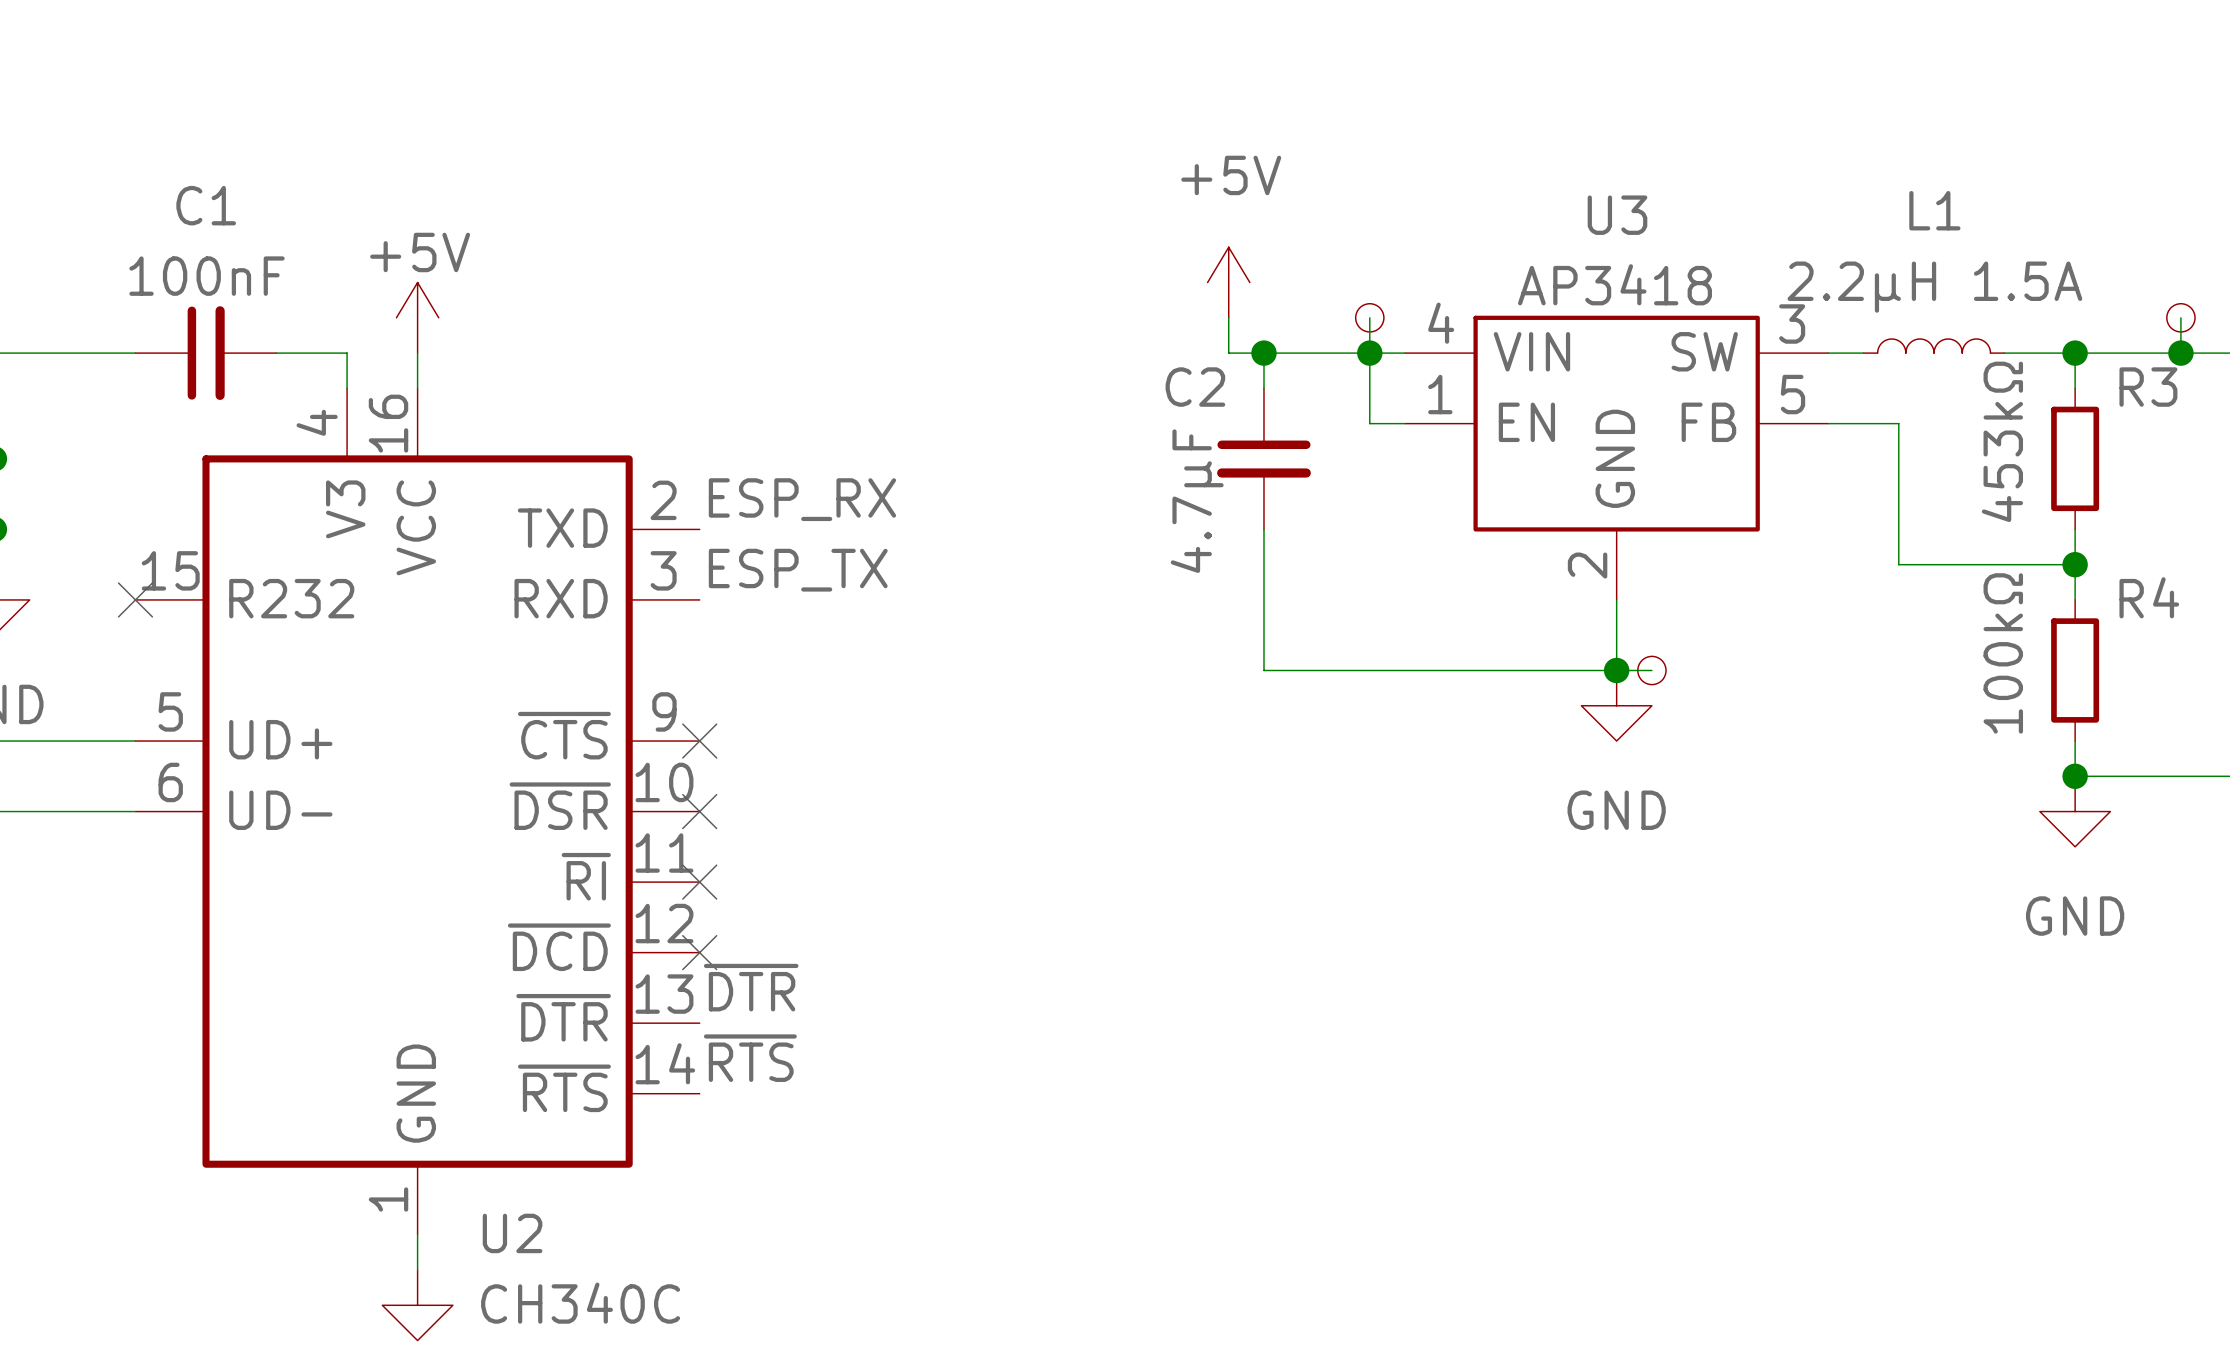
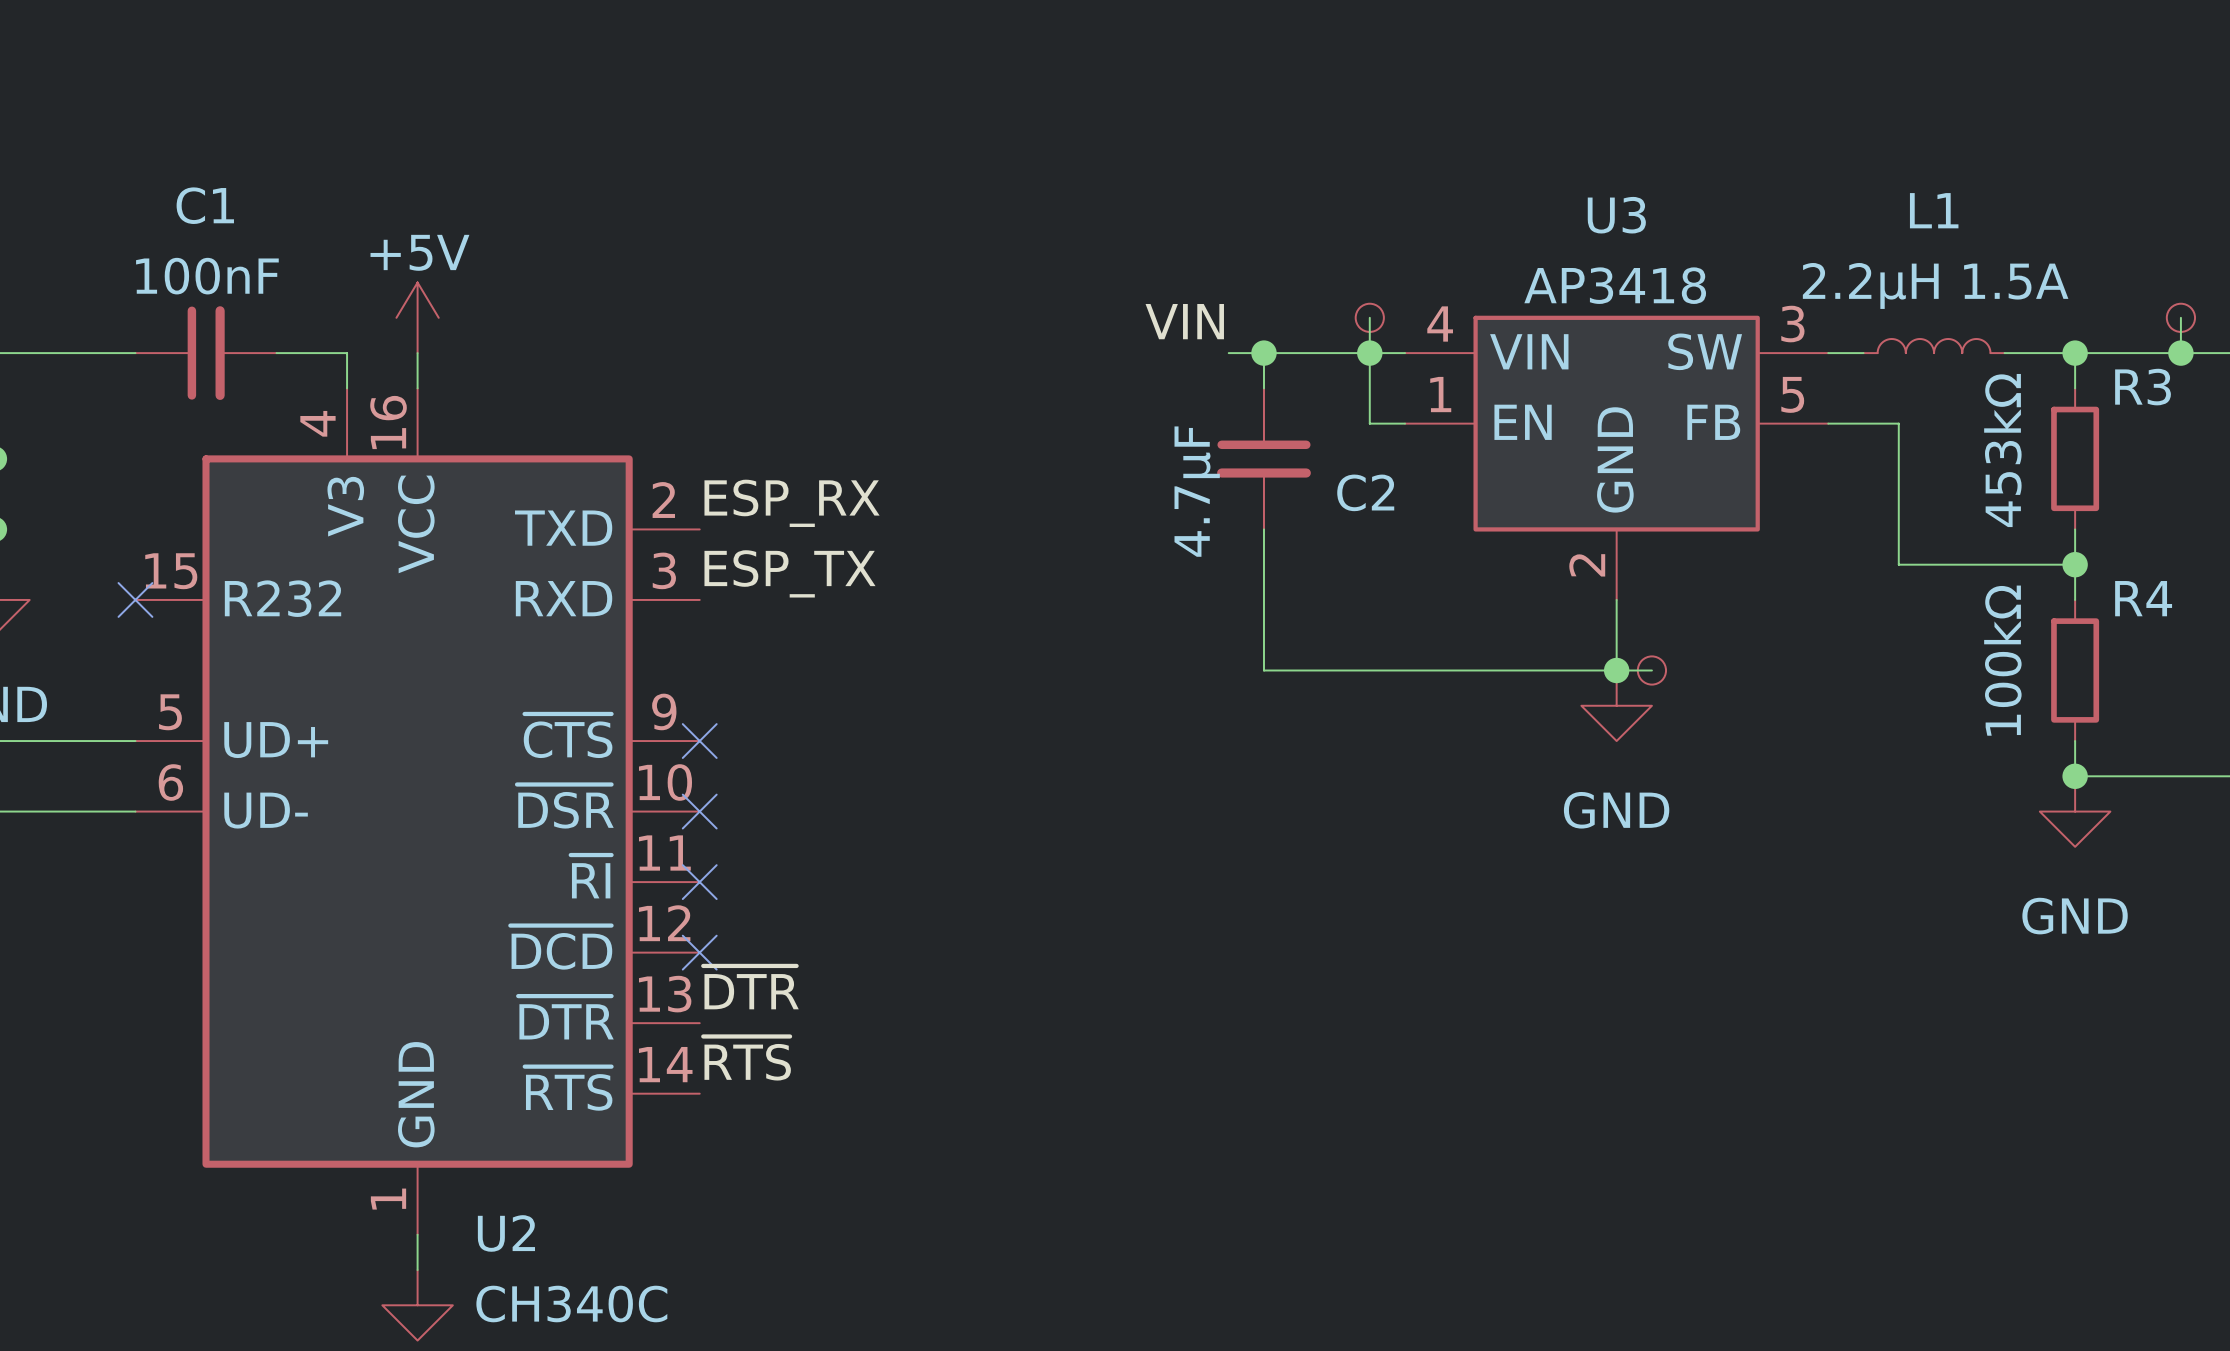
power symbol: +5V (1228, 282) -> none
wire: (1228, 317) (1228, 353) -> none
label: none -> VIN (1184, 321)
C2 name position: C2 (1195, 387) -> C2 (1365, 492)

